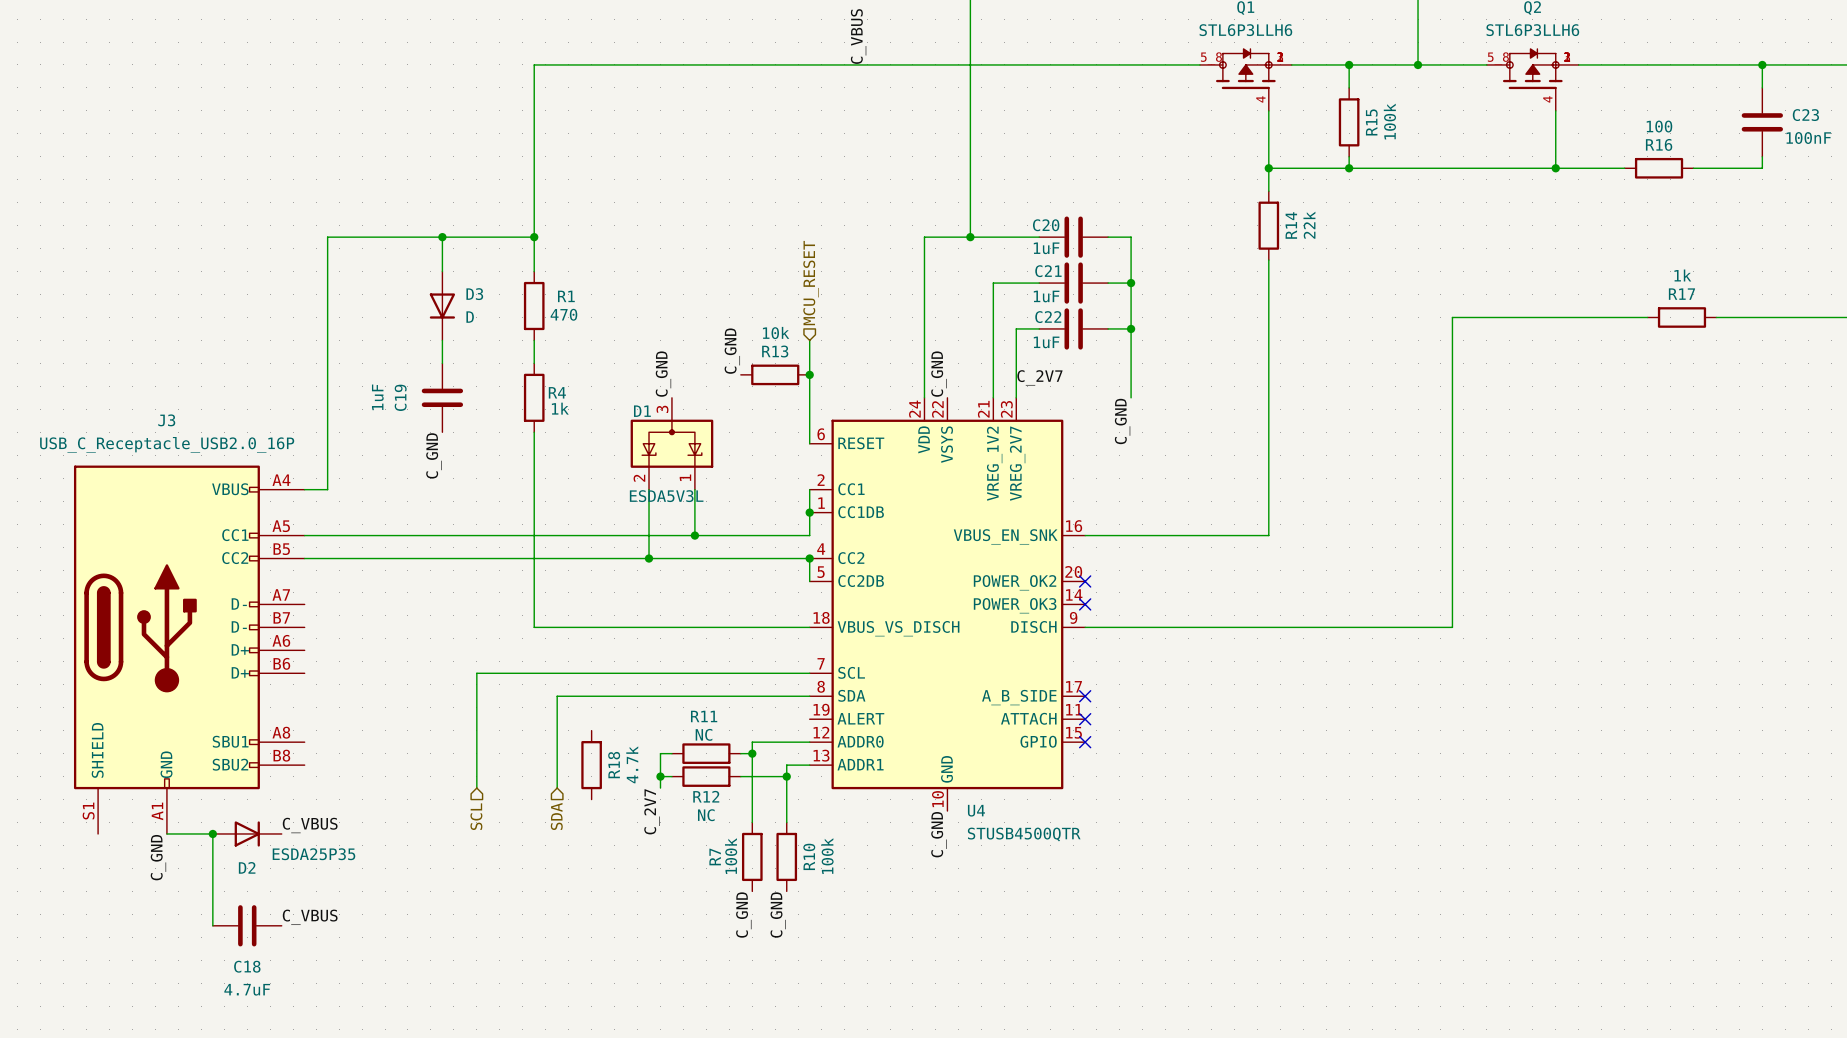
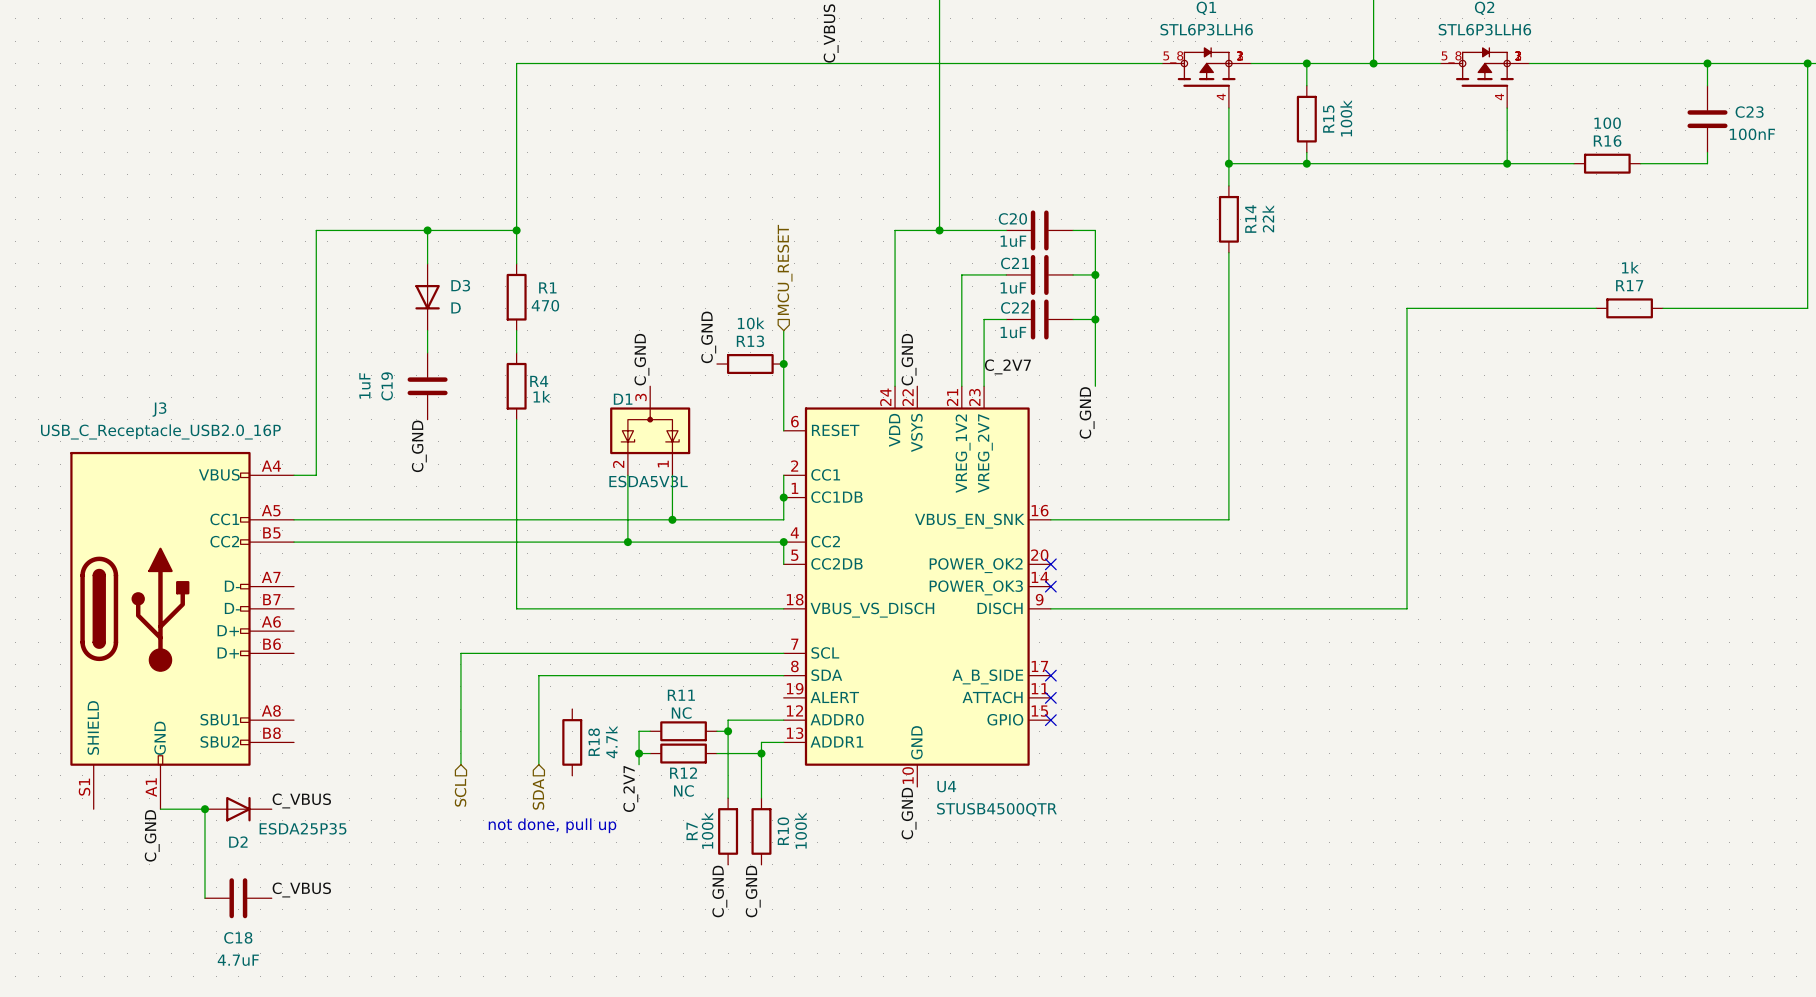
text: none -> not done, pull up (552, 825)

